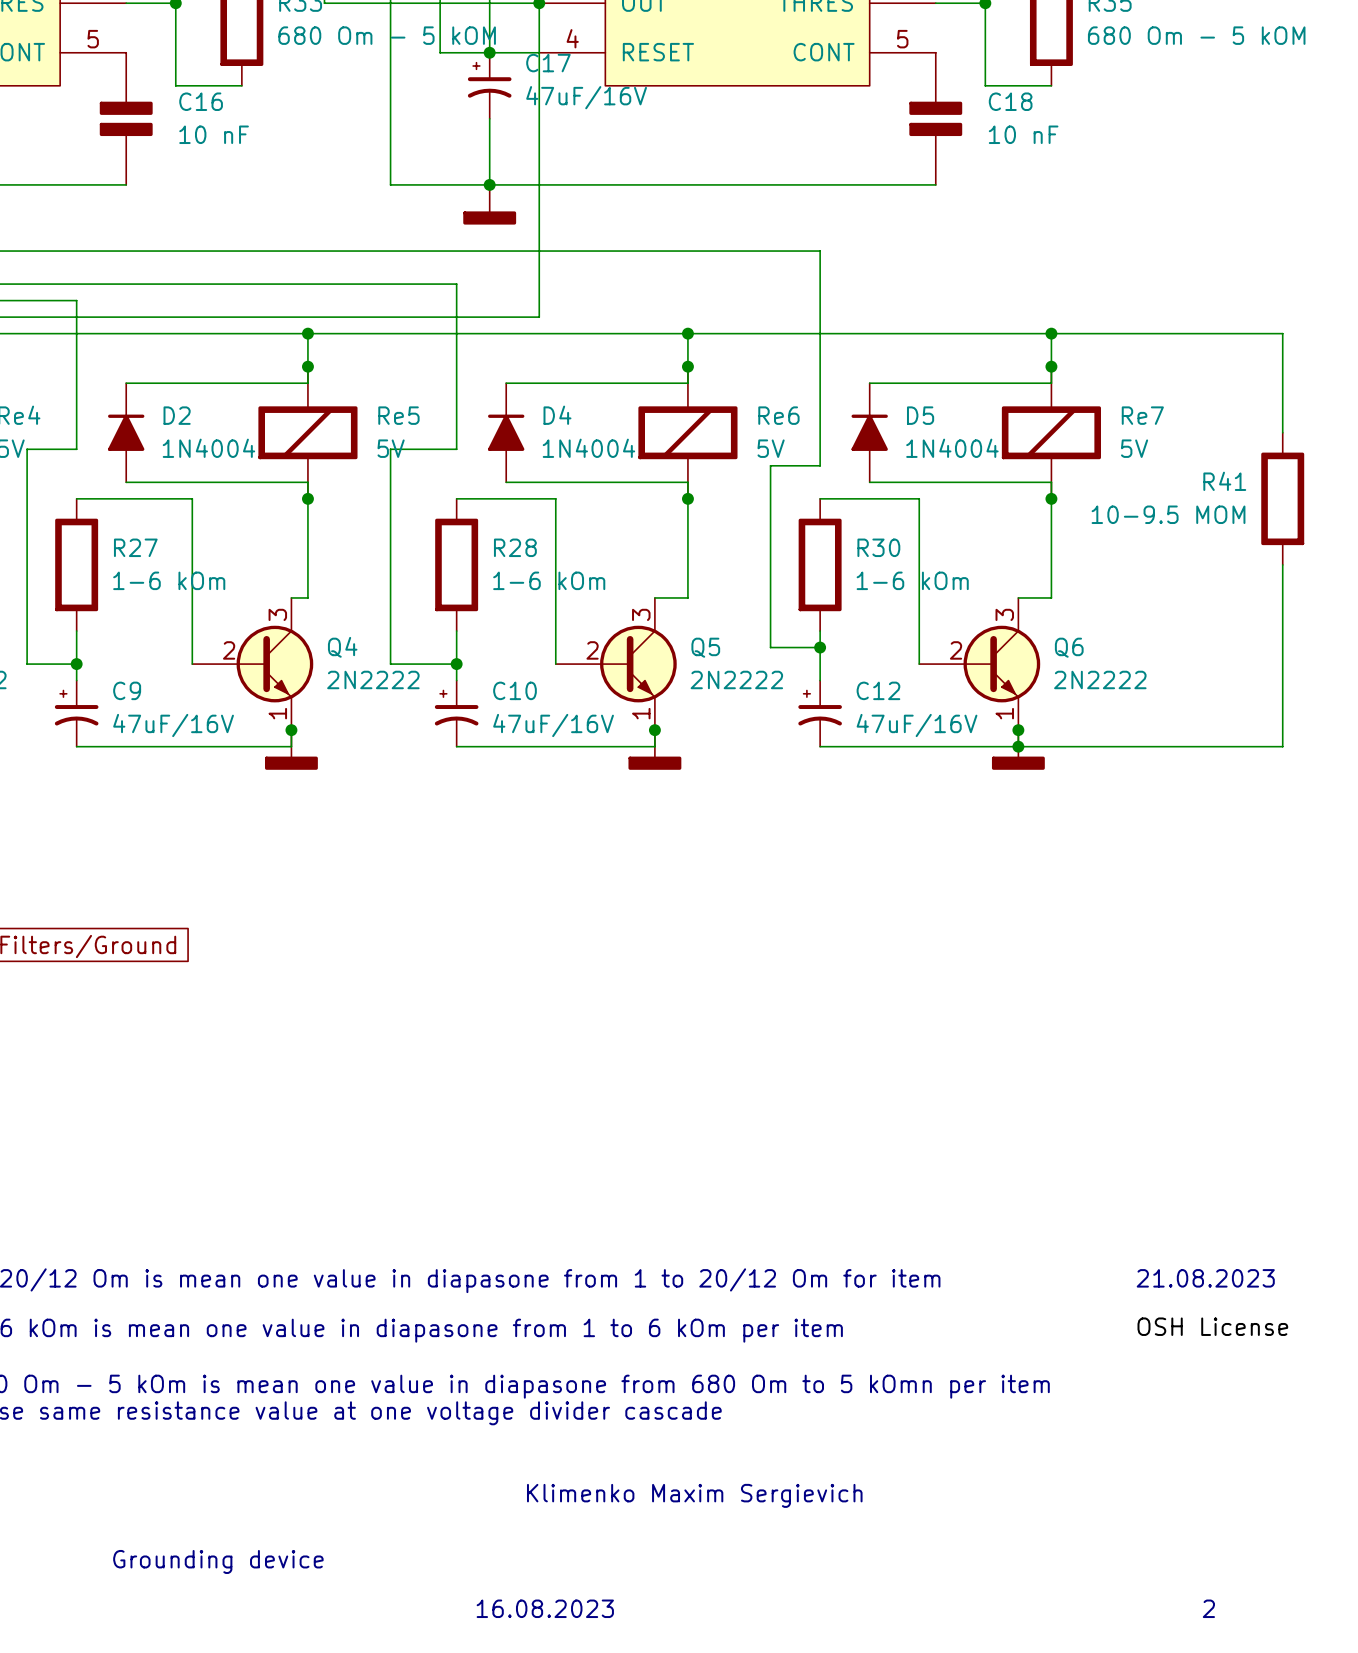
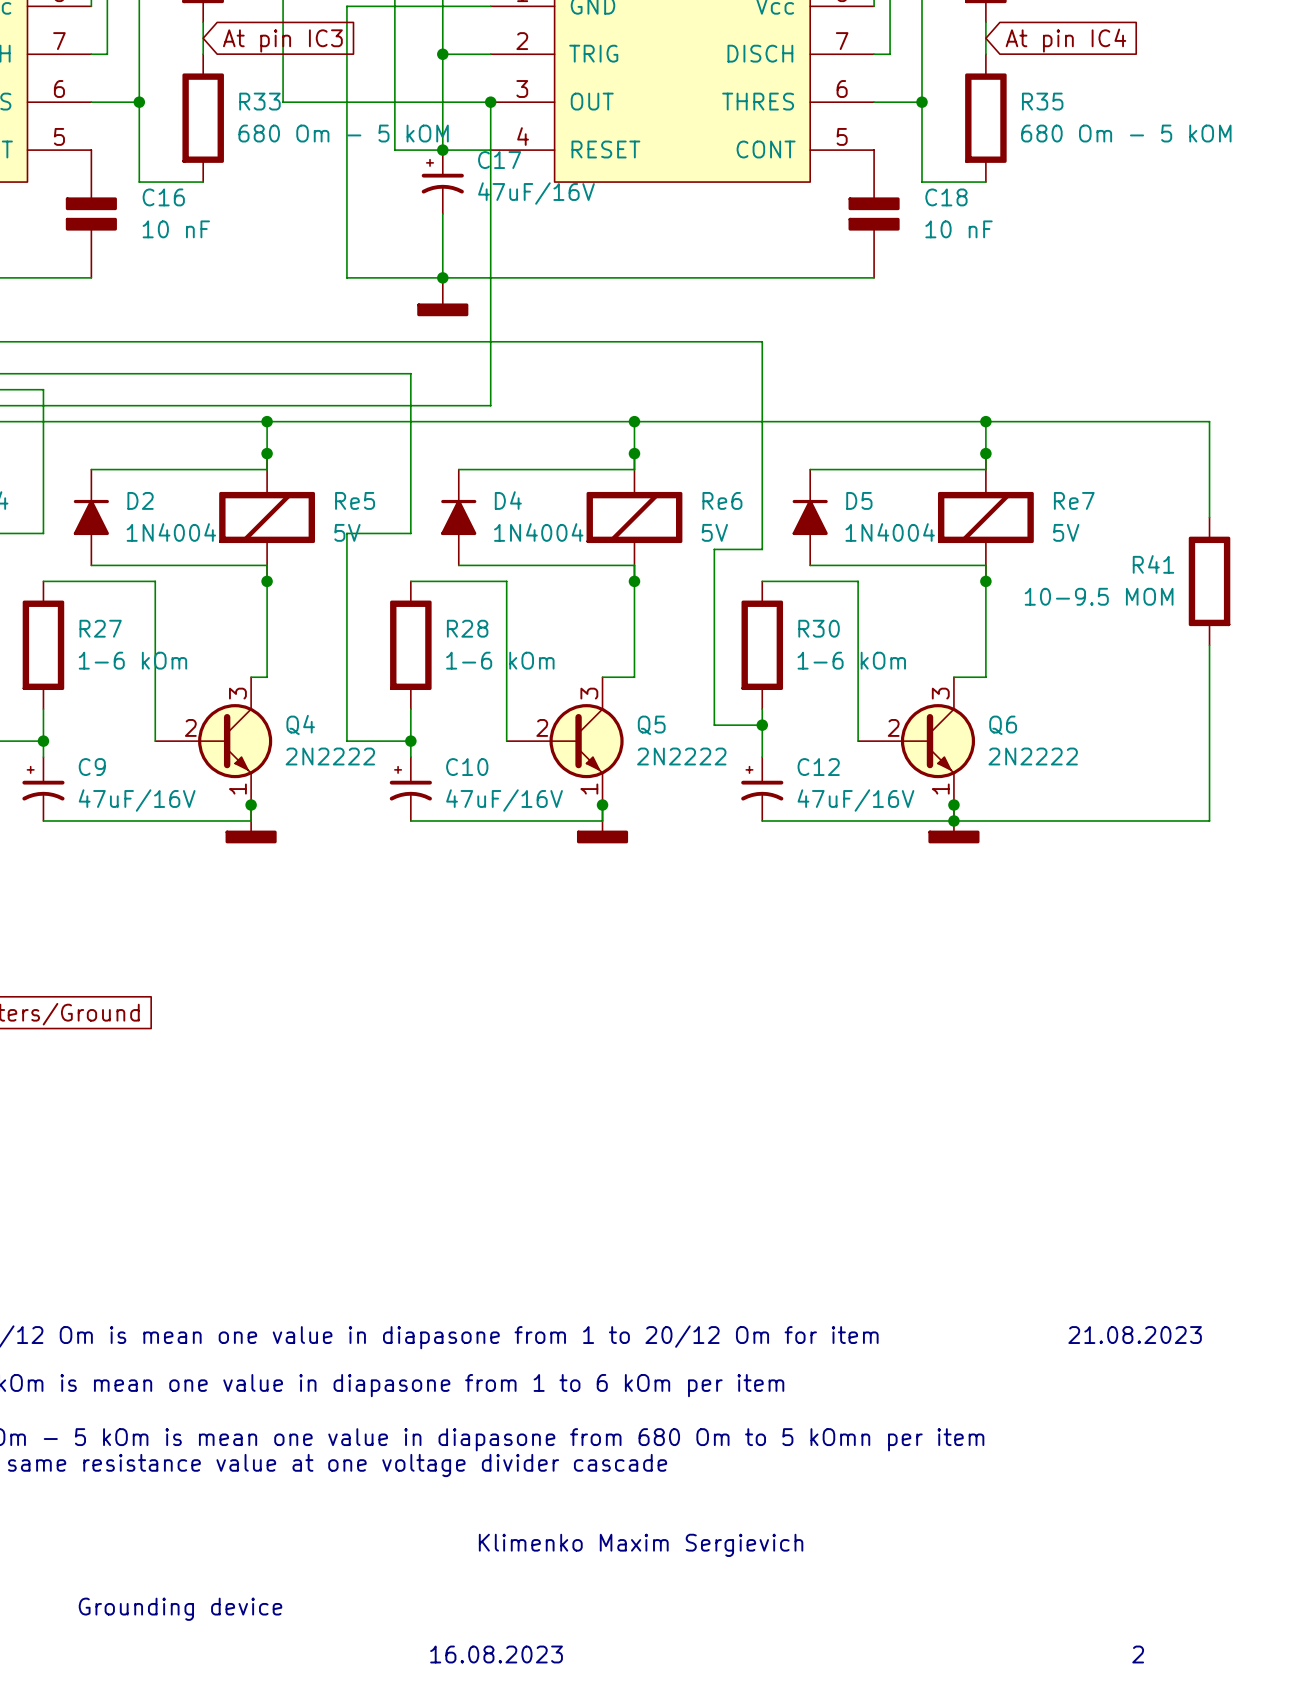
label: OSH License (1212, 1326) -> none

